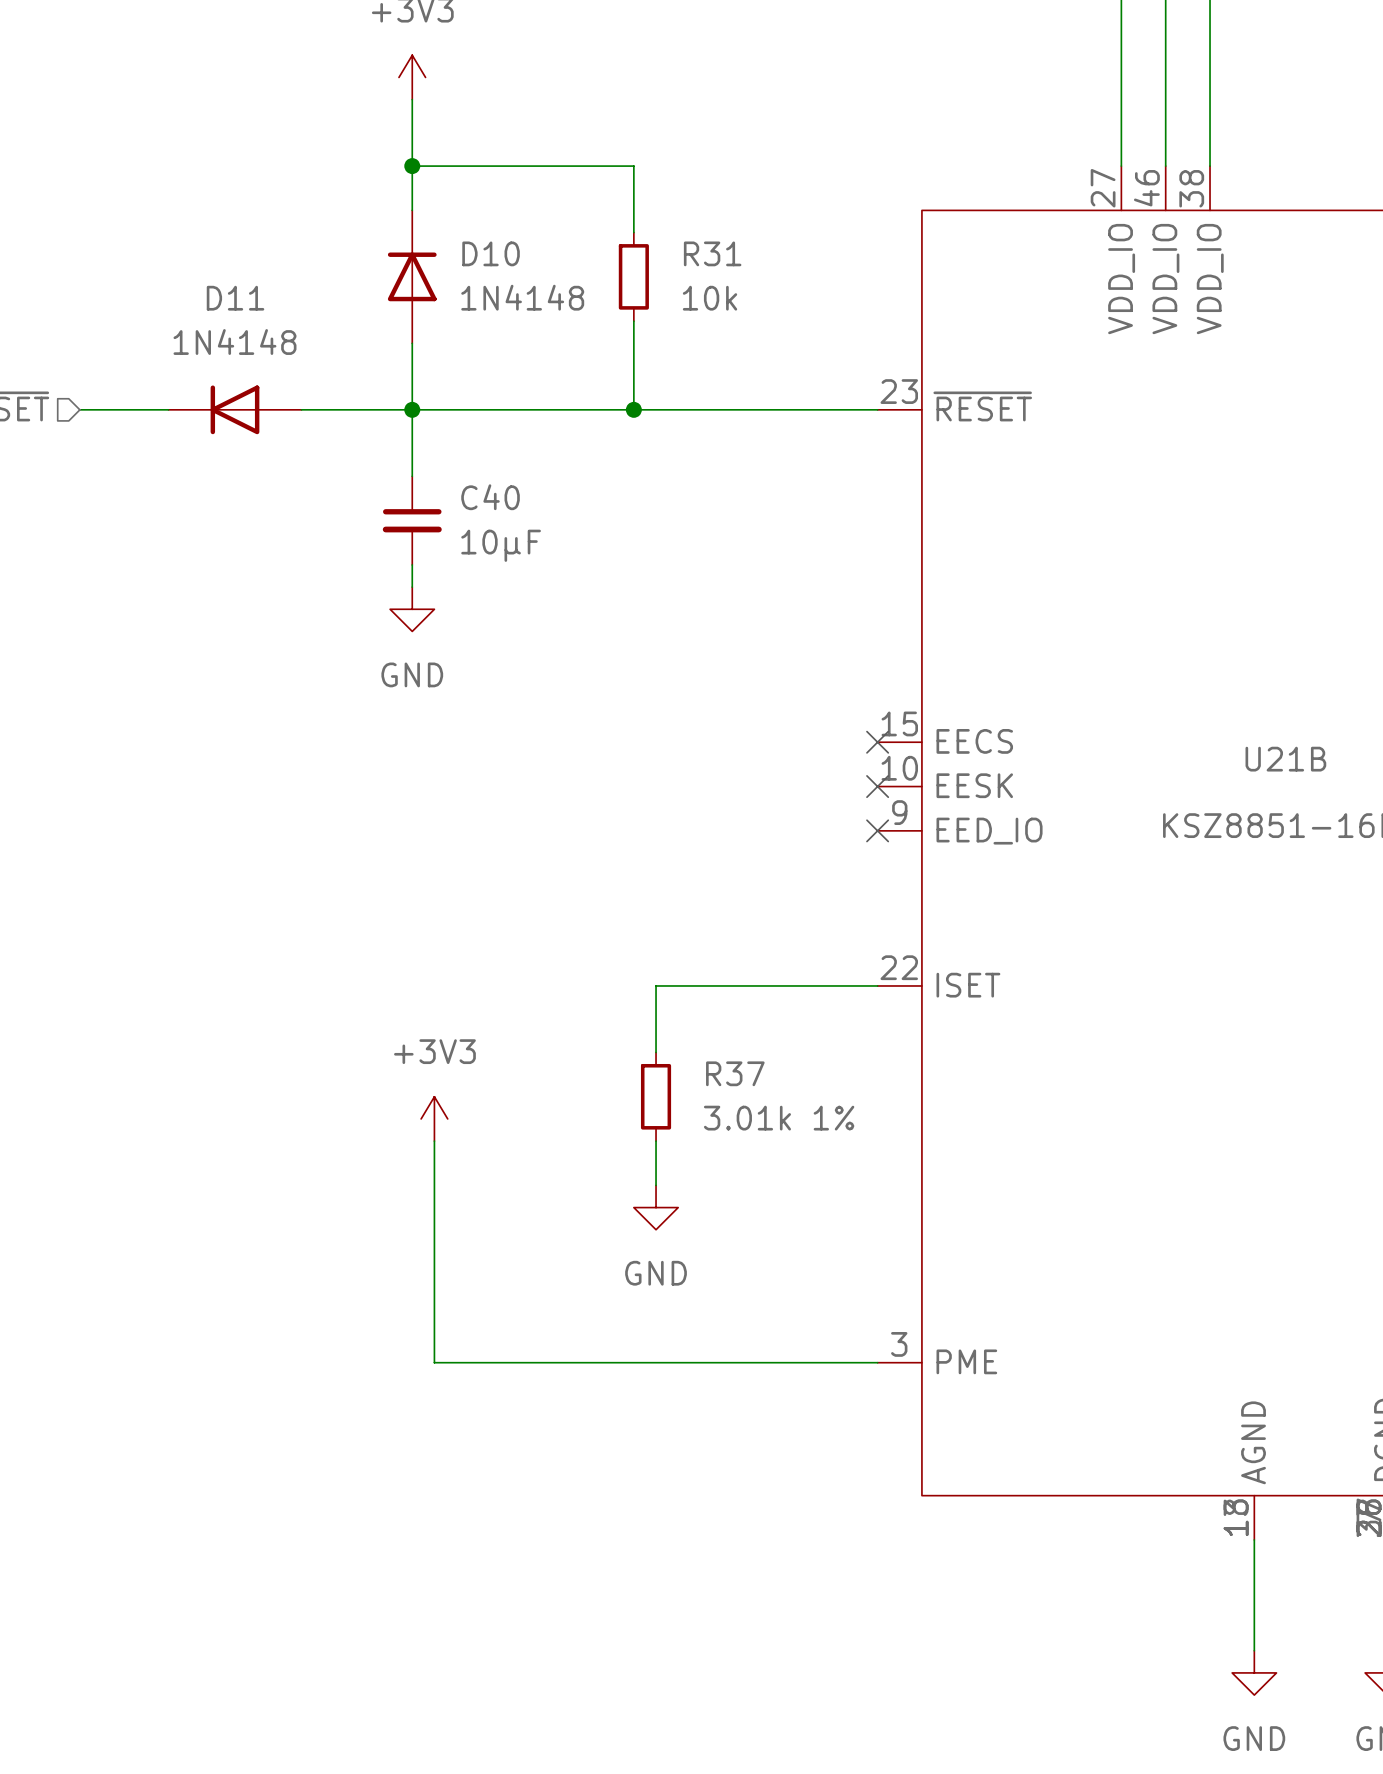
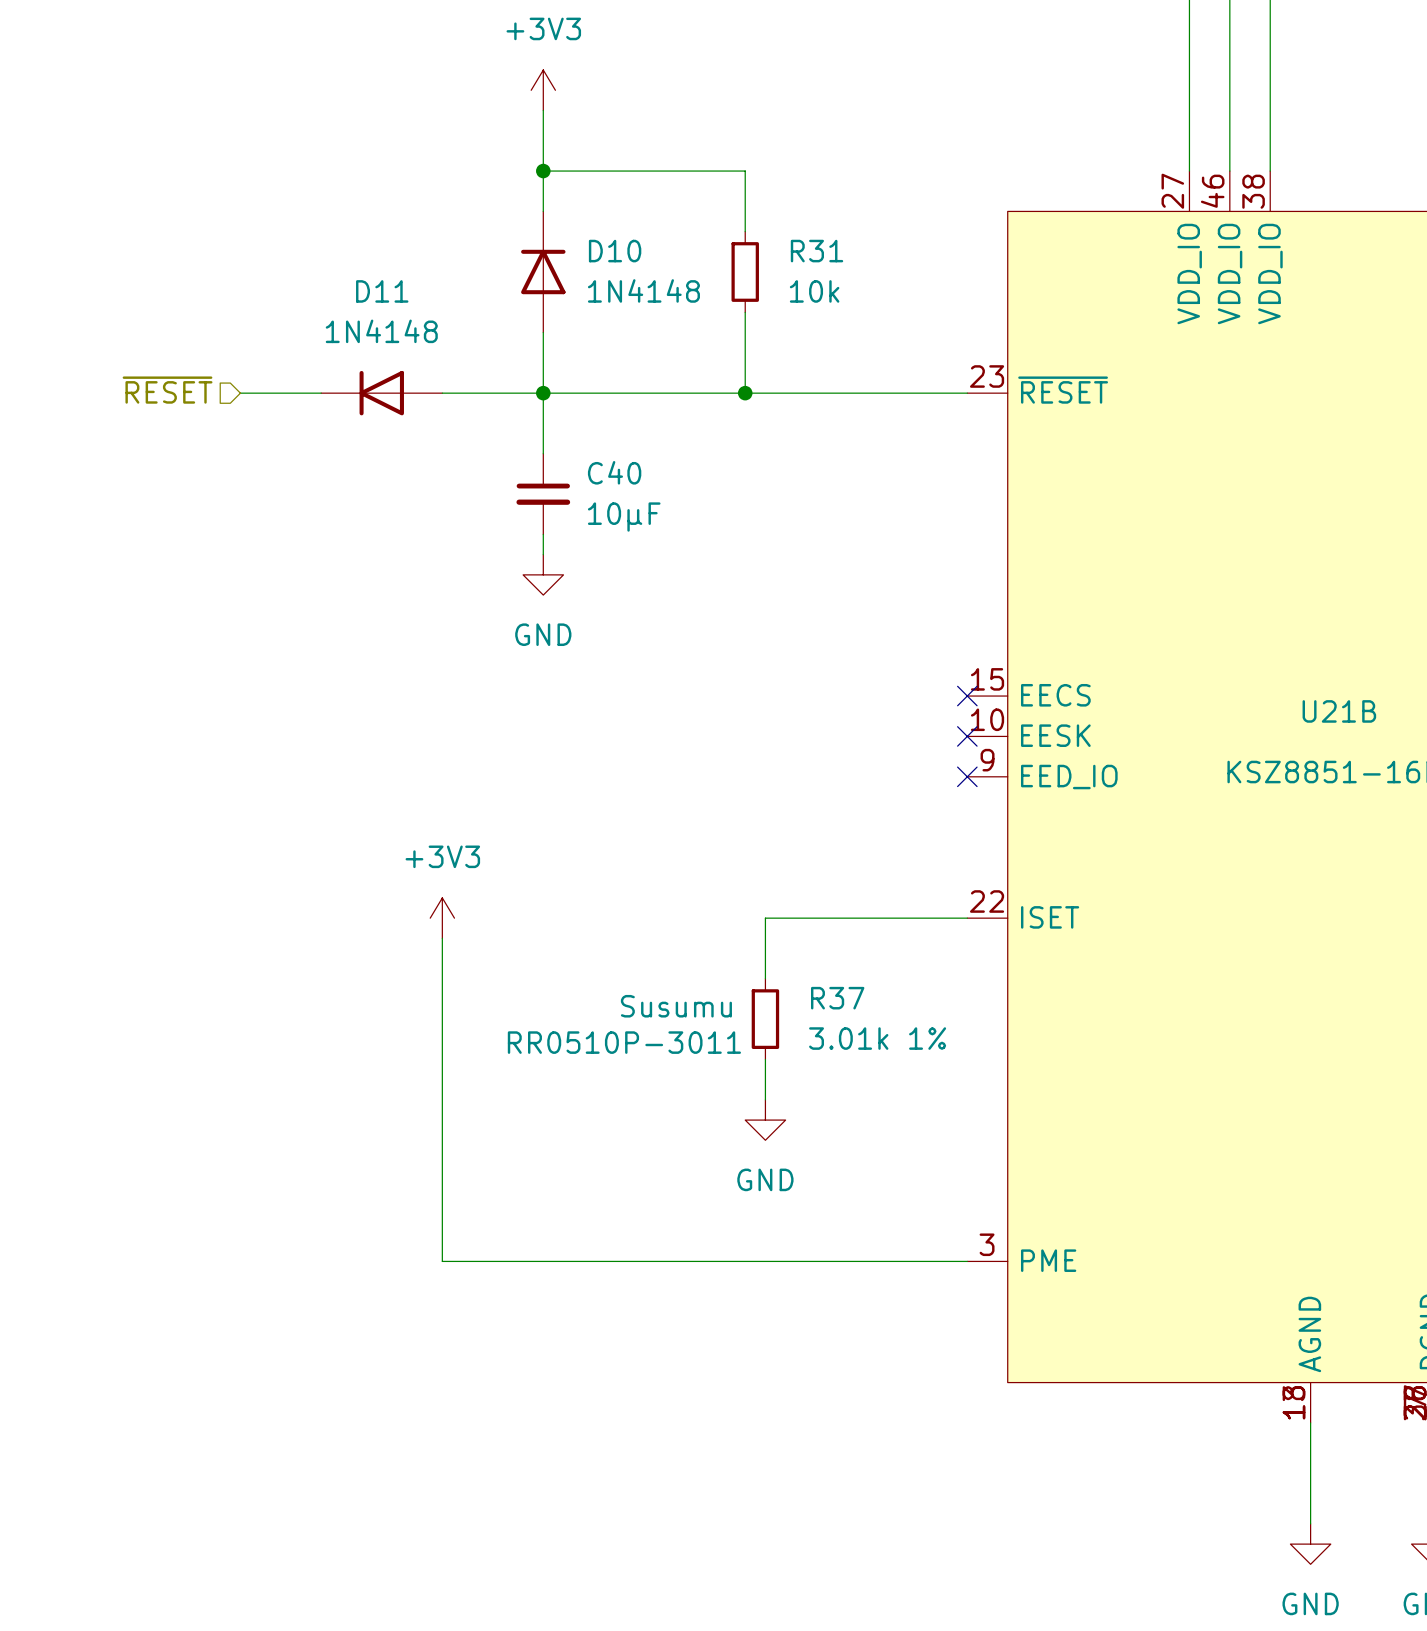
R37 text: none -> Susumu (676, 1006)
power symbol position: +3V3 (434, 1118) -> +3V3 (442, 918)
R37 text: none -> RR0510P-3011 (624, 1042)
wire: (434, 1141) (434, 1362) -> (442, 938) (442, 1261) (563, 1261)

